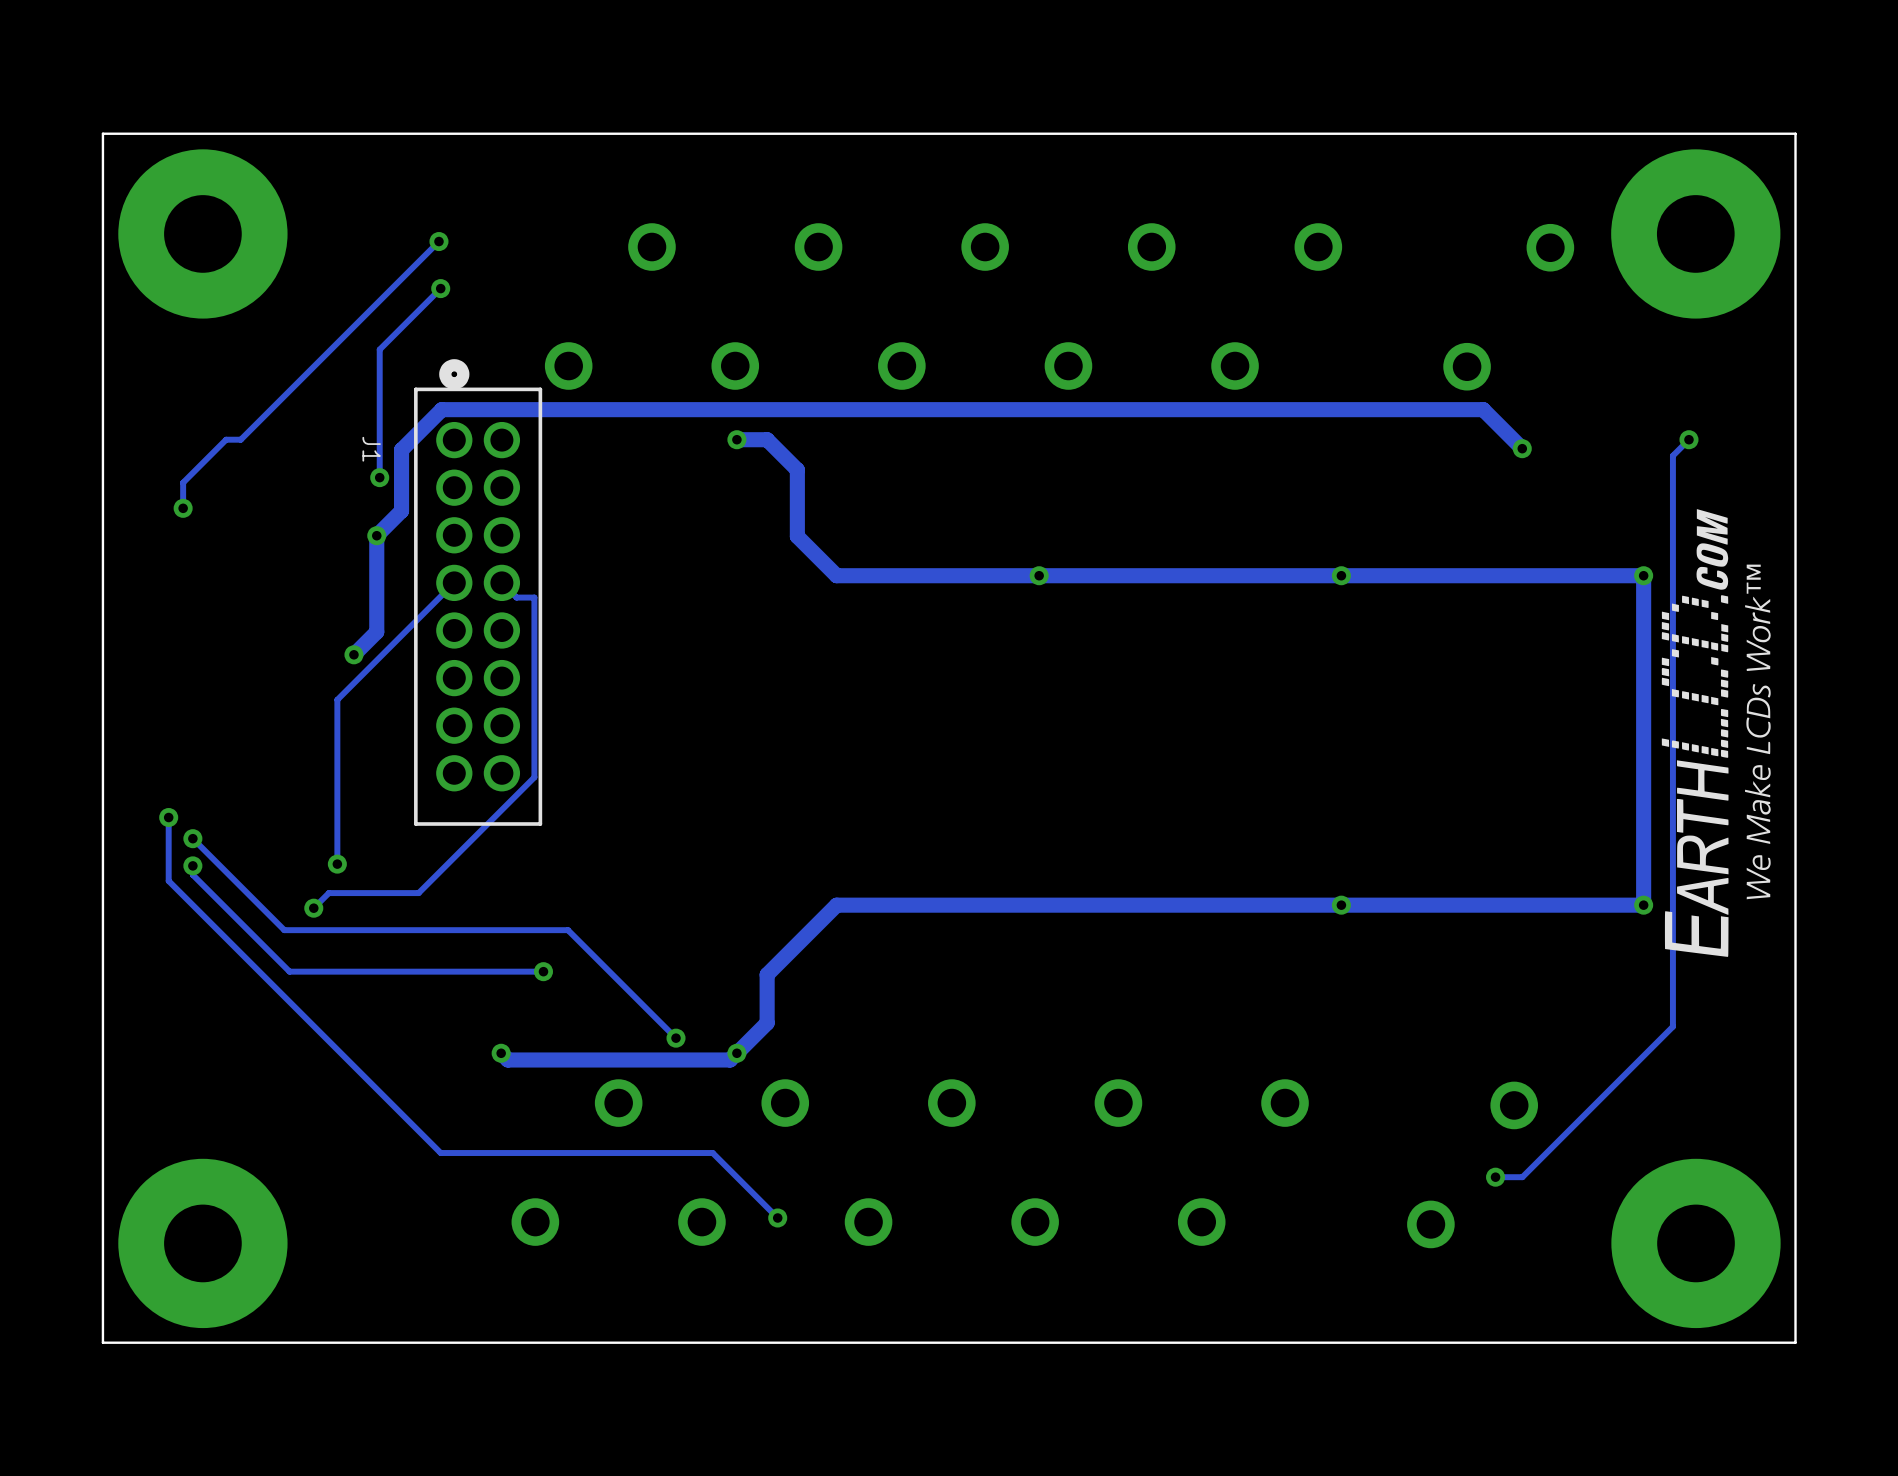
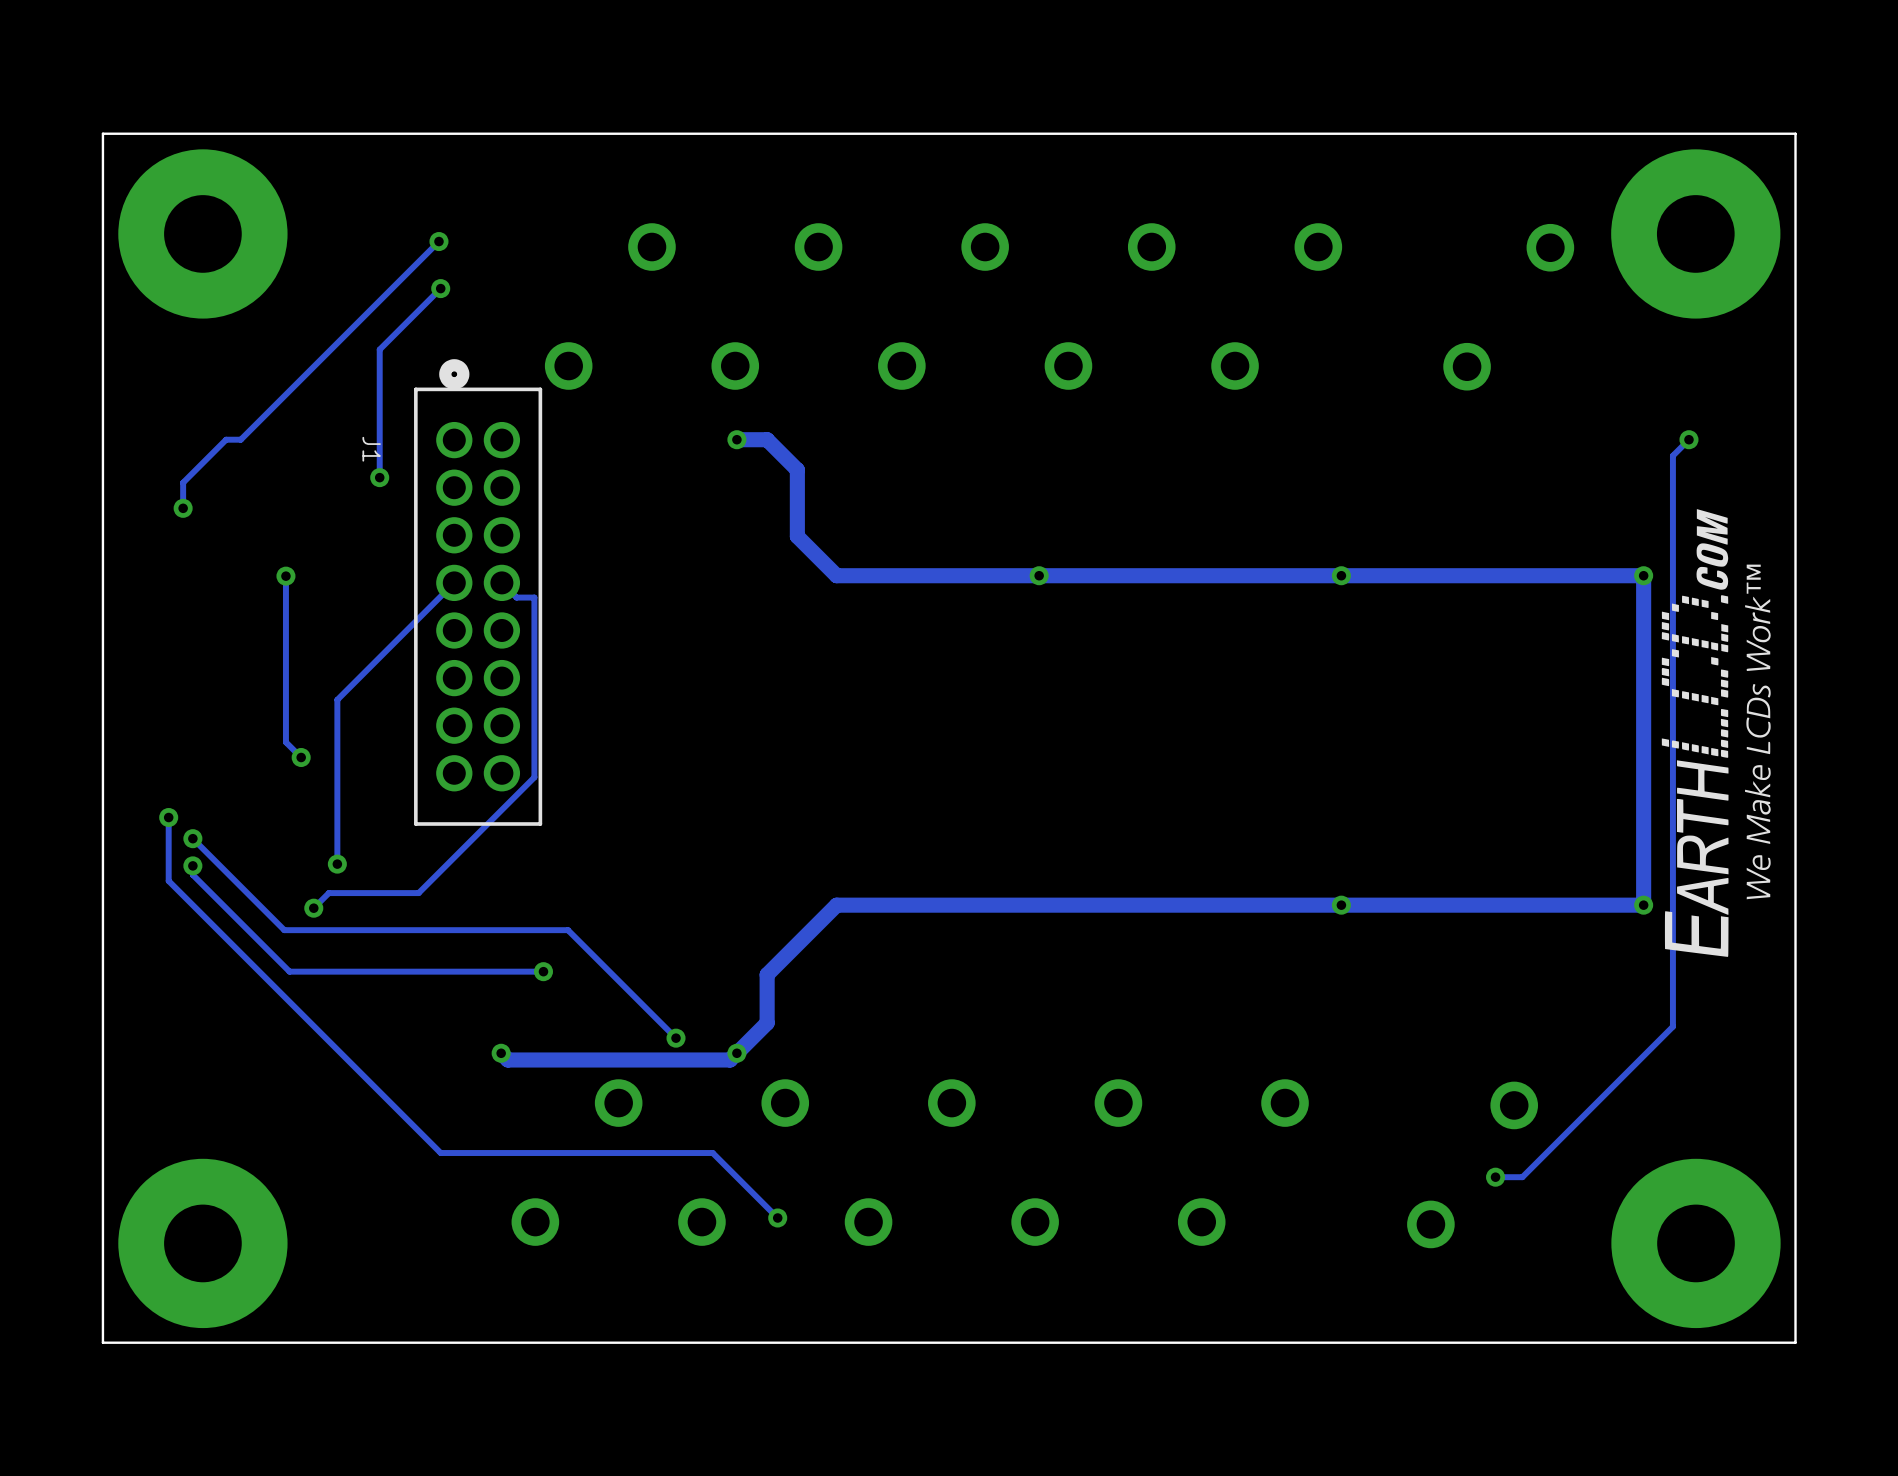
track: (1522, 448) (1483, 409) (441, 409) (401, 449) (401, 510) (376, 535) (376, 631) (353, 654) -> none
via: (1522, 448) -> none
via: (376, 535) -> none
track: none -> (285, 576) (285, 742) (301, 757)
via: none -> (285, 576)
via: (353, 654) -> none
via: none -> (301, 757)

